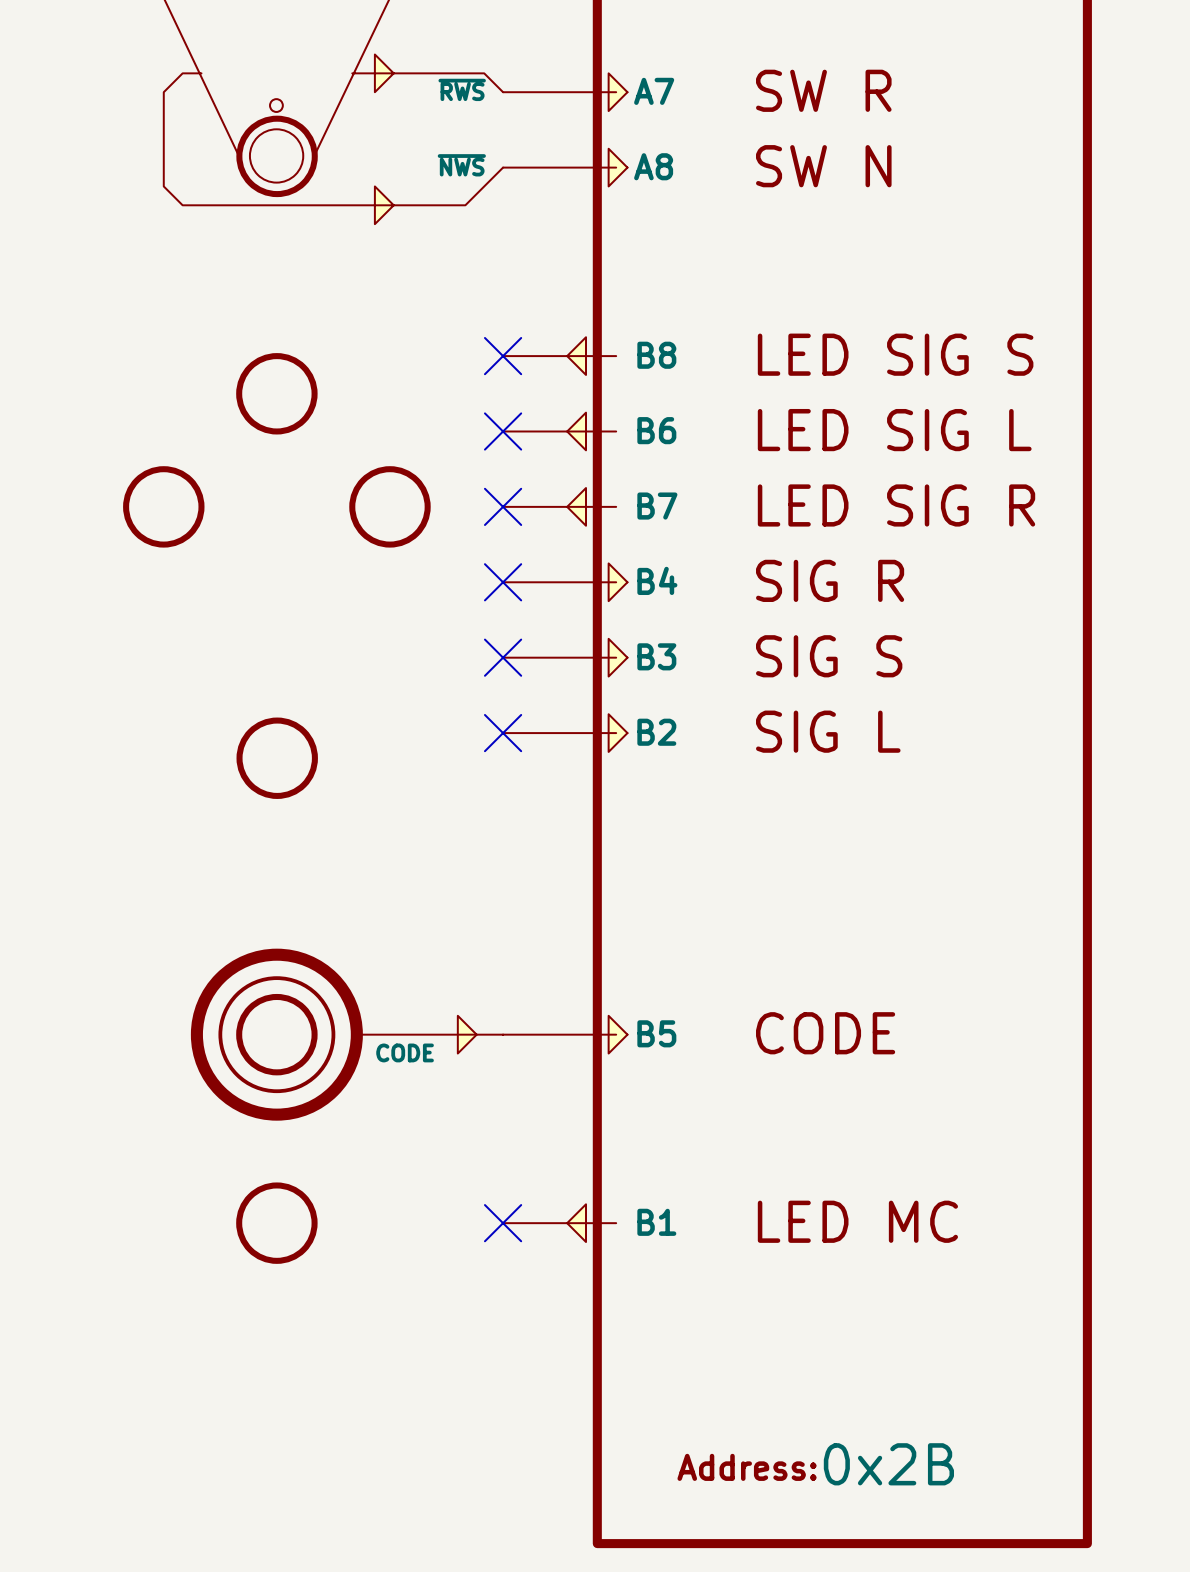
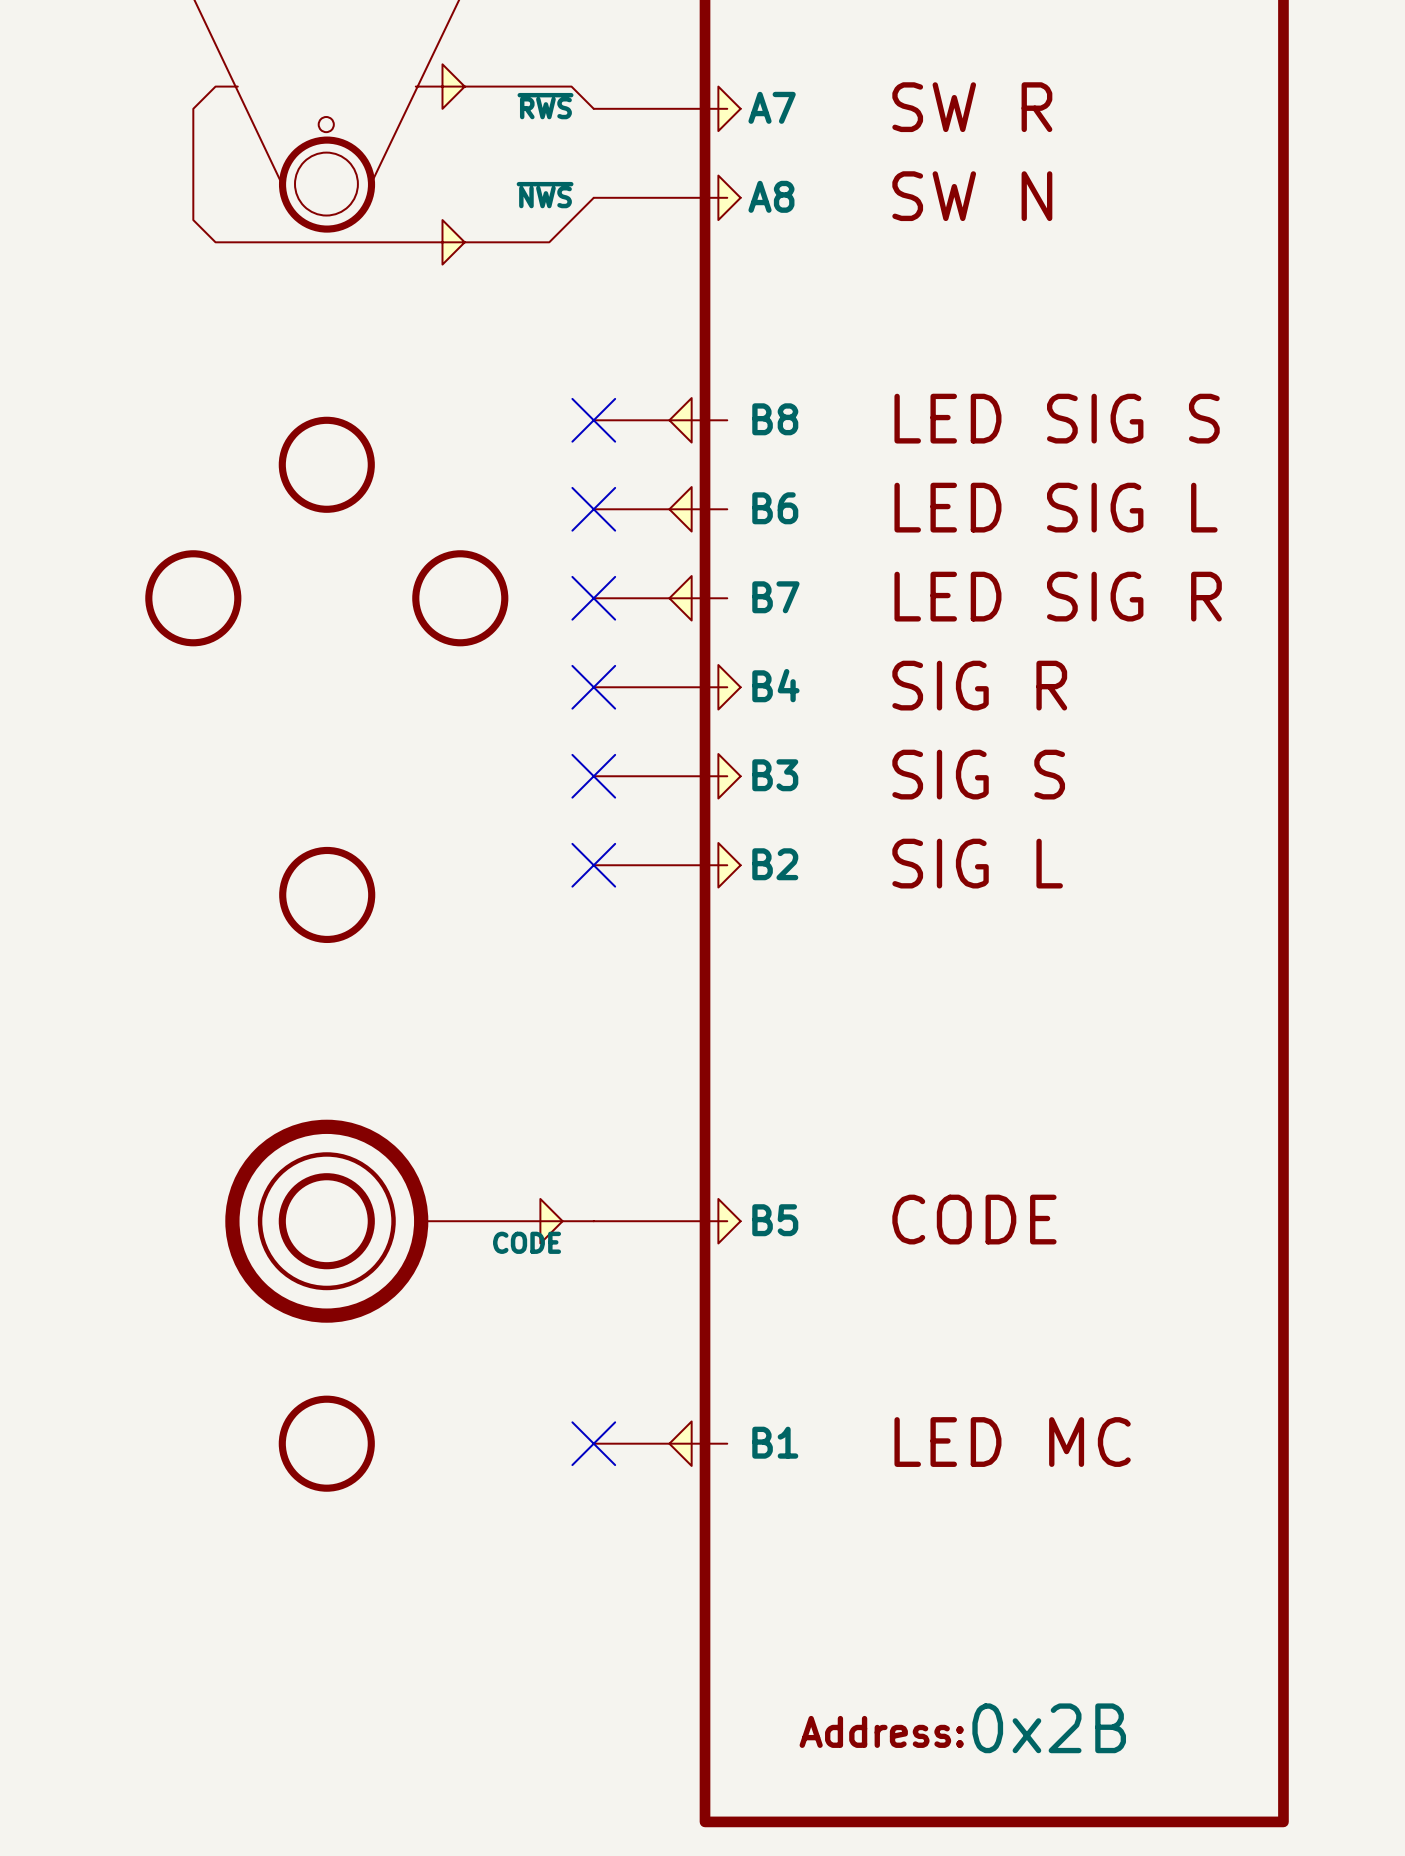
part value position: CODE (405, 1052) -> CODE (527, 1242)

